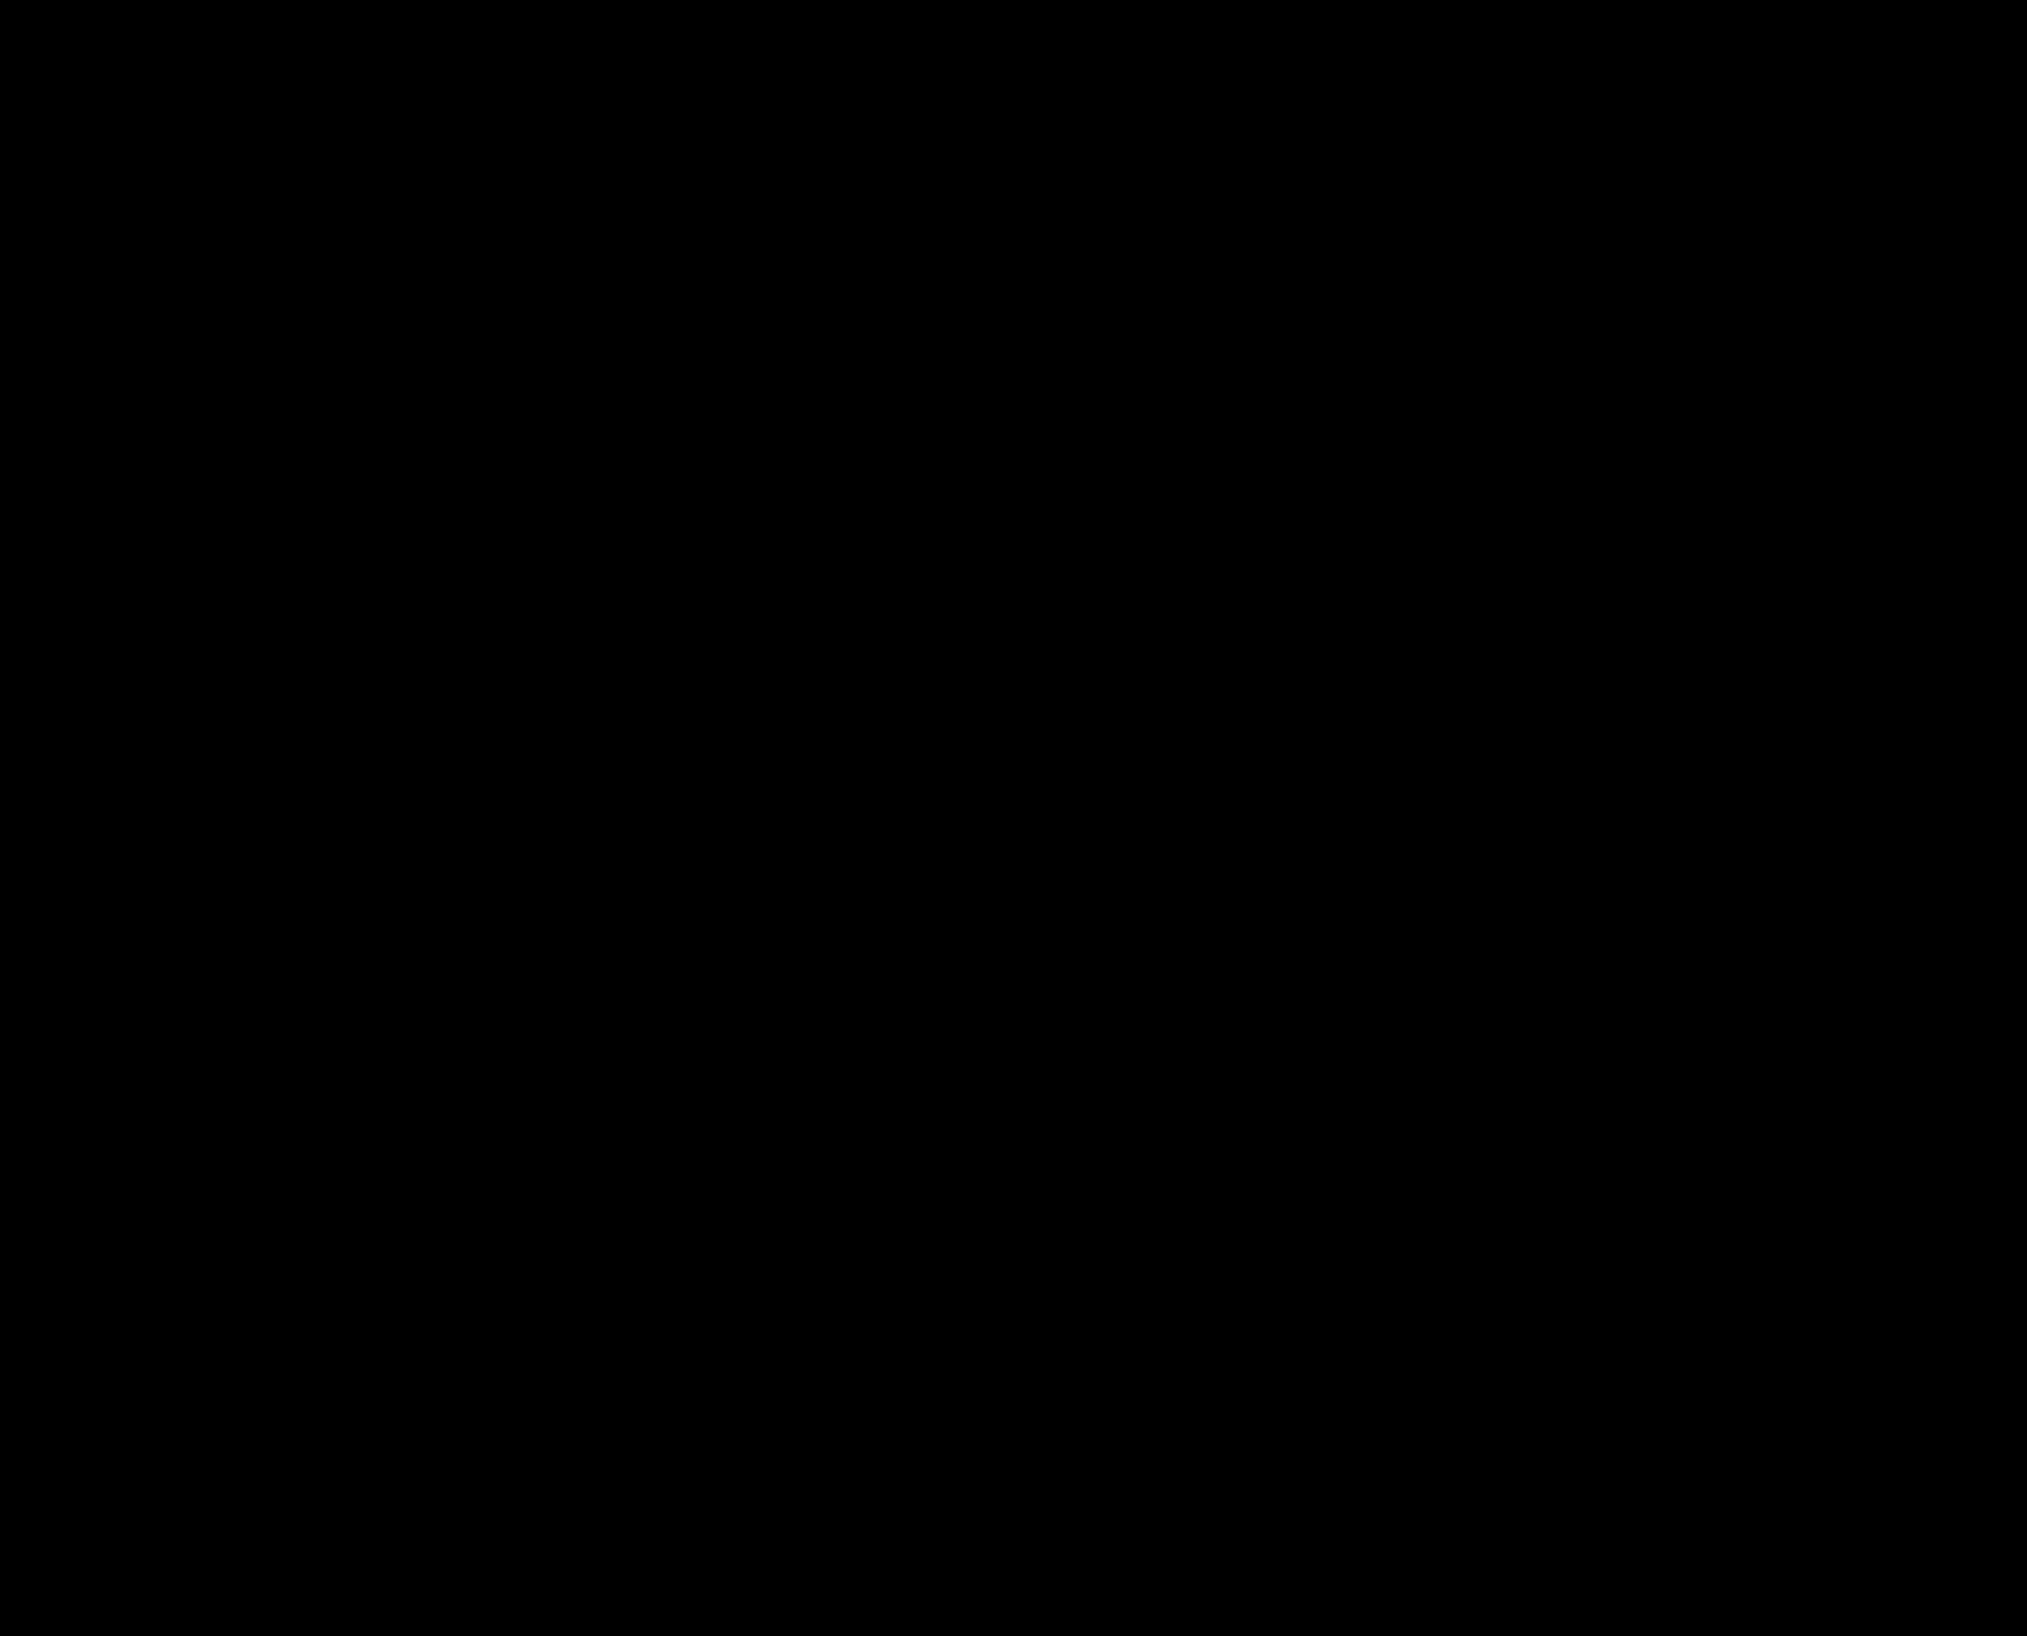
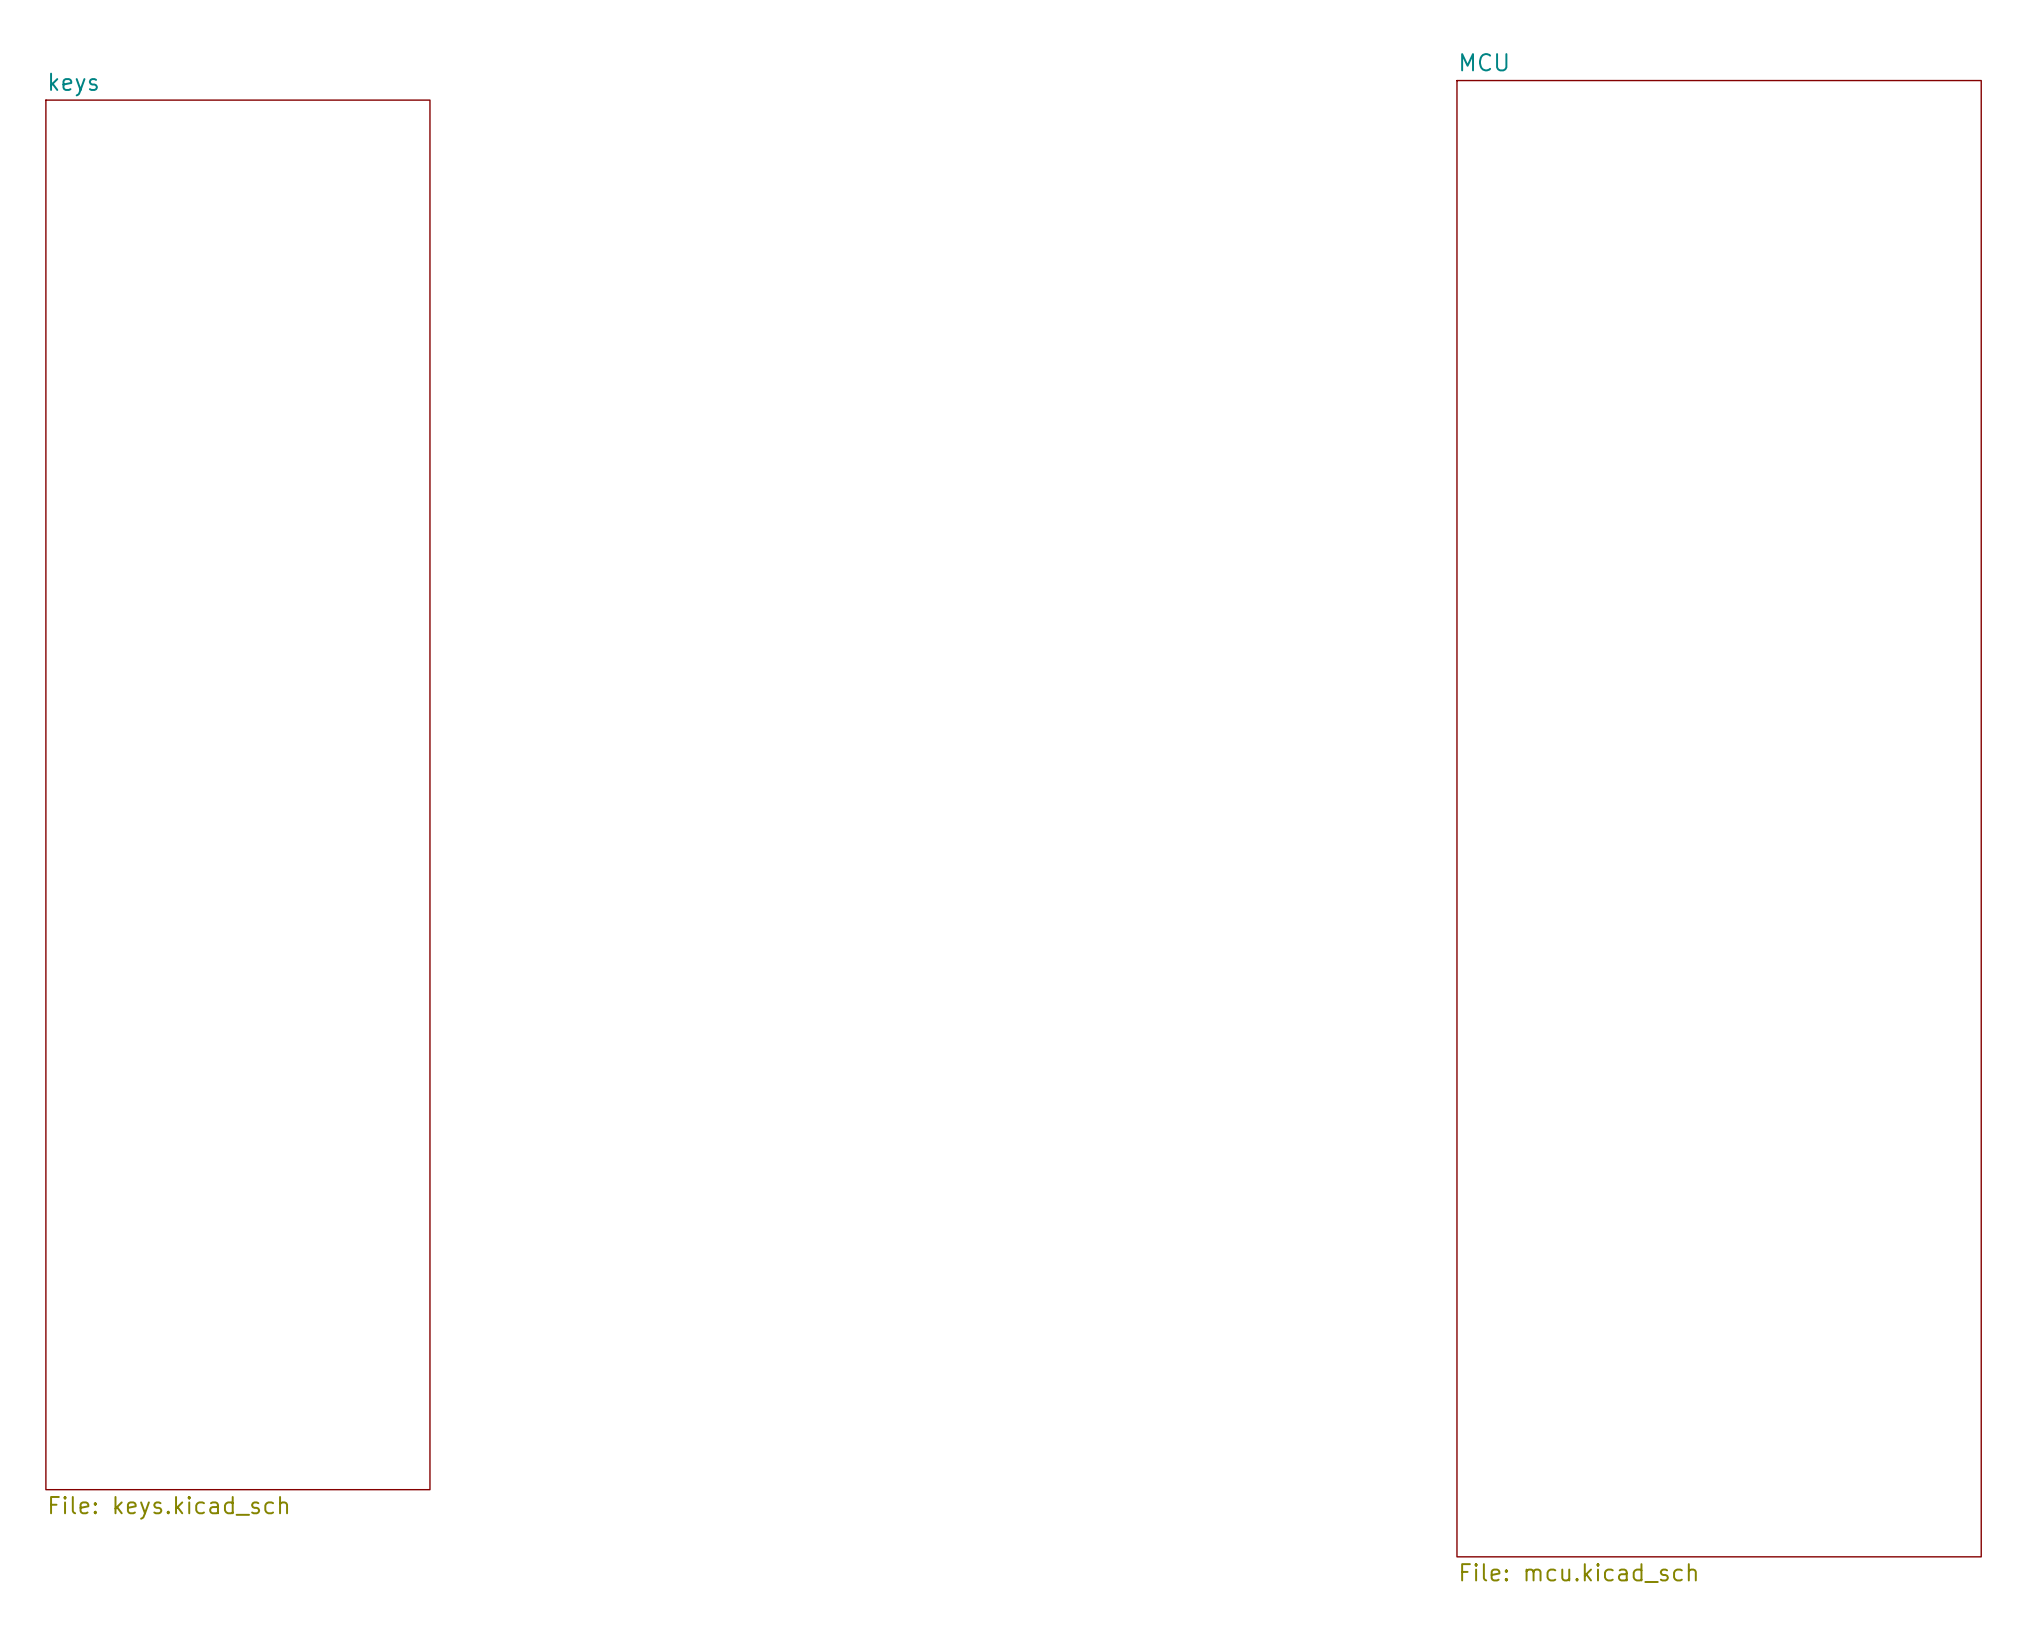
sheet keys: none -> File: keys.kicad_sch (237, 794)
sheet MCU: none -> File: mcu.kicad_sch (1719, 818)

